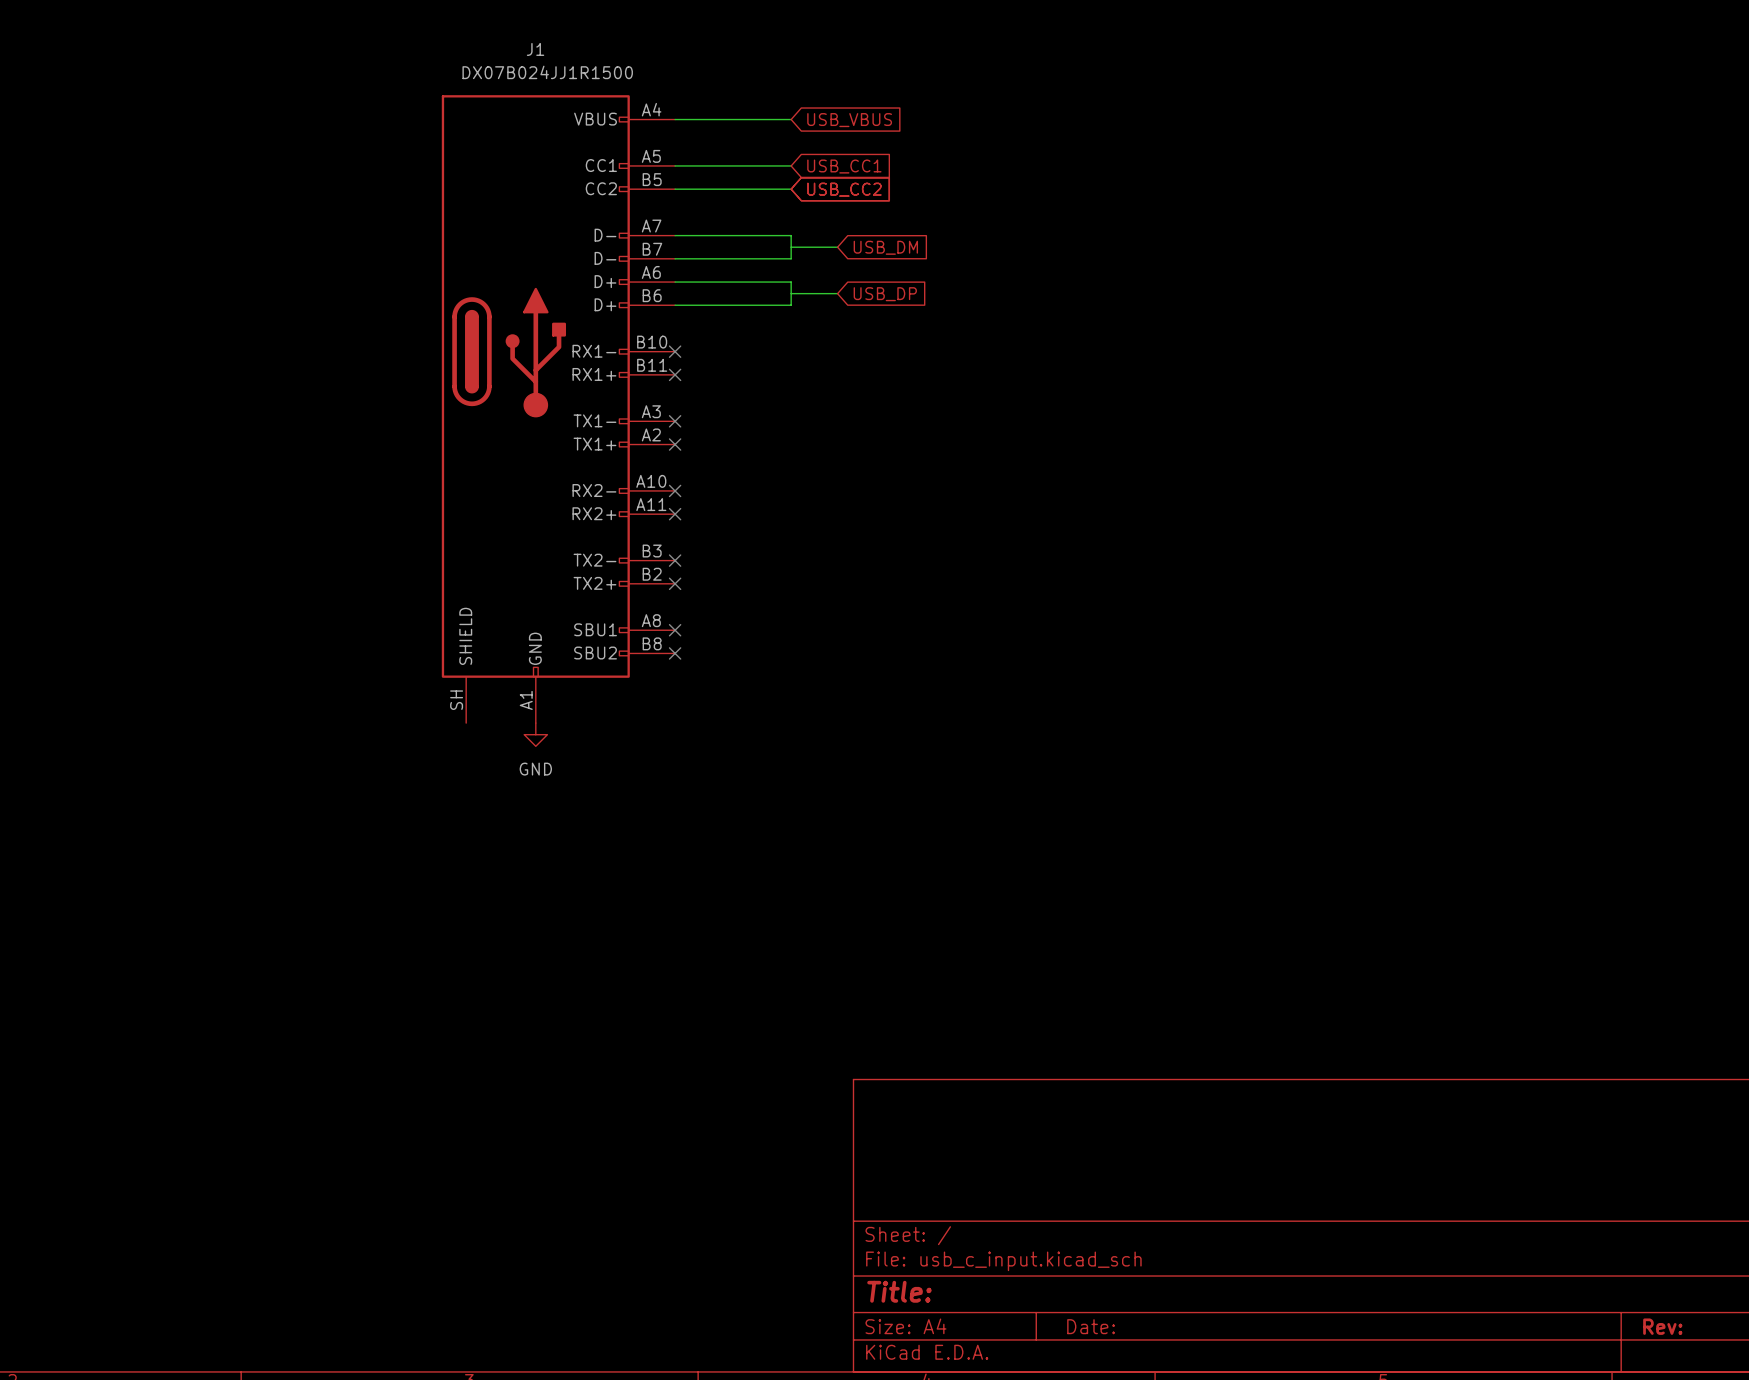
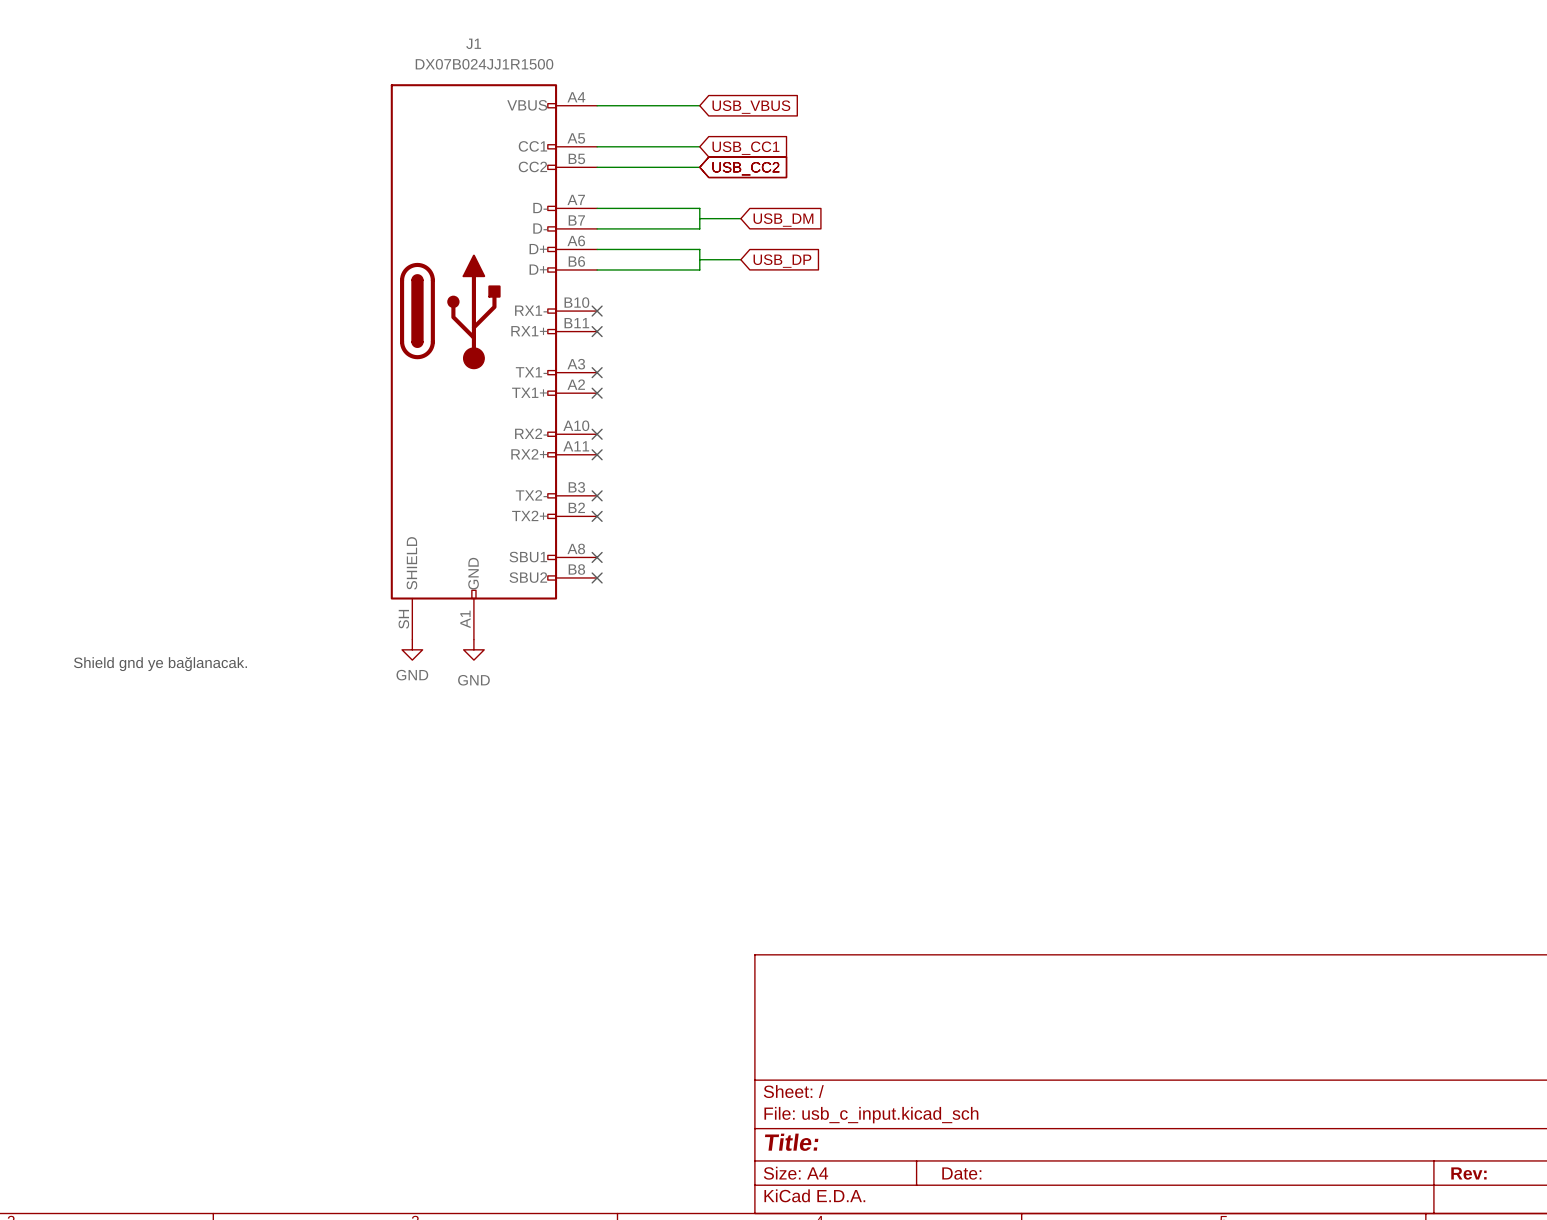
power symbol: none -> GND (412, 649)
text: none -> Shield gnd ye bağlanacak. (160, 664)

